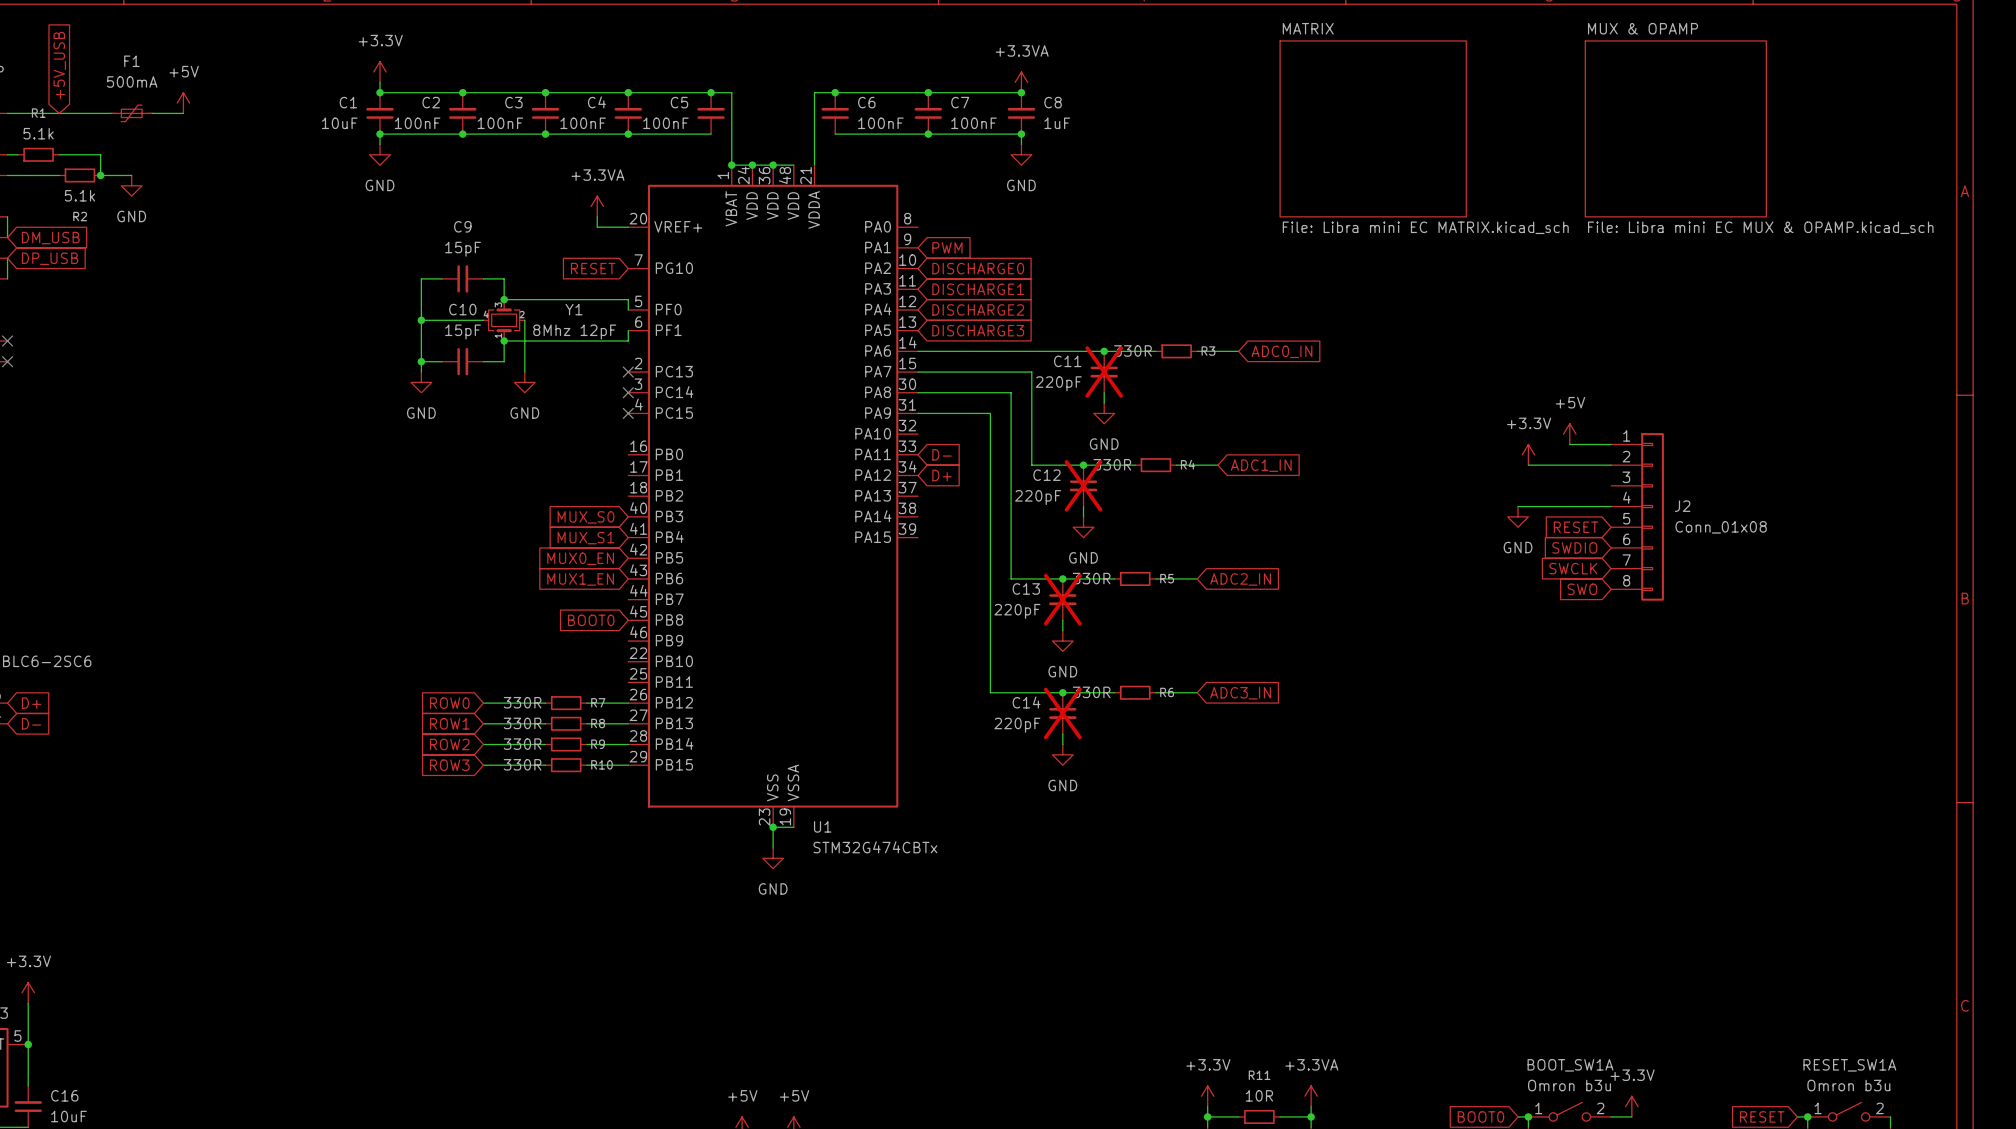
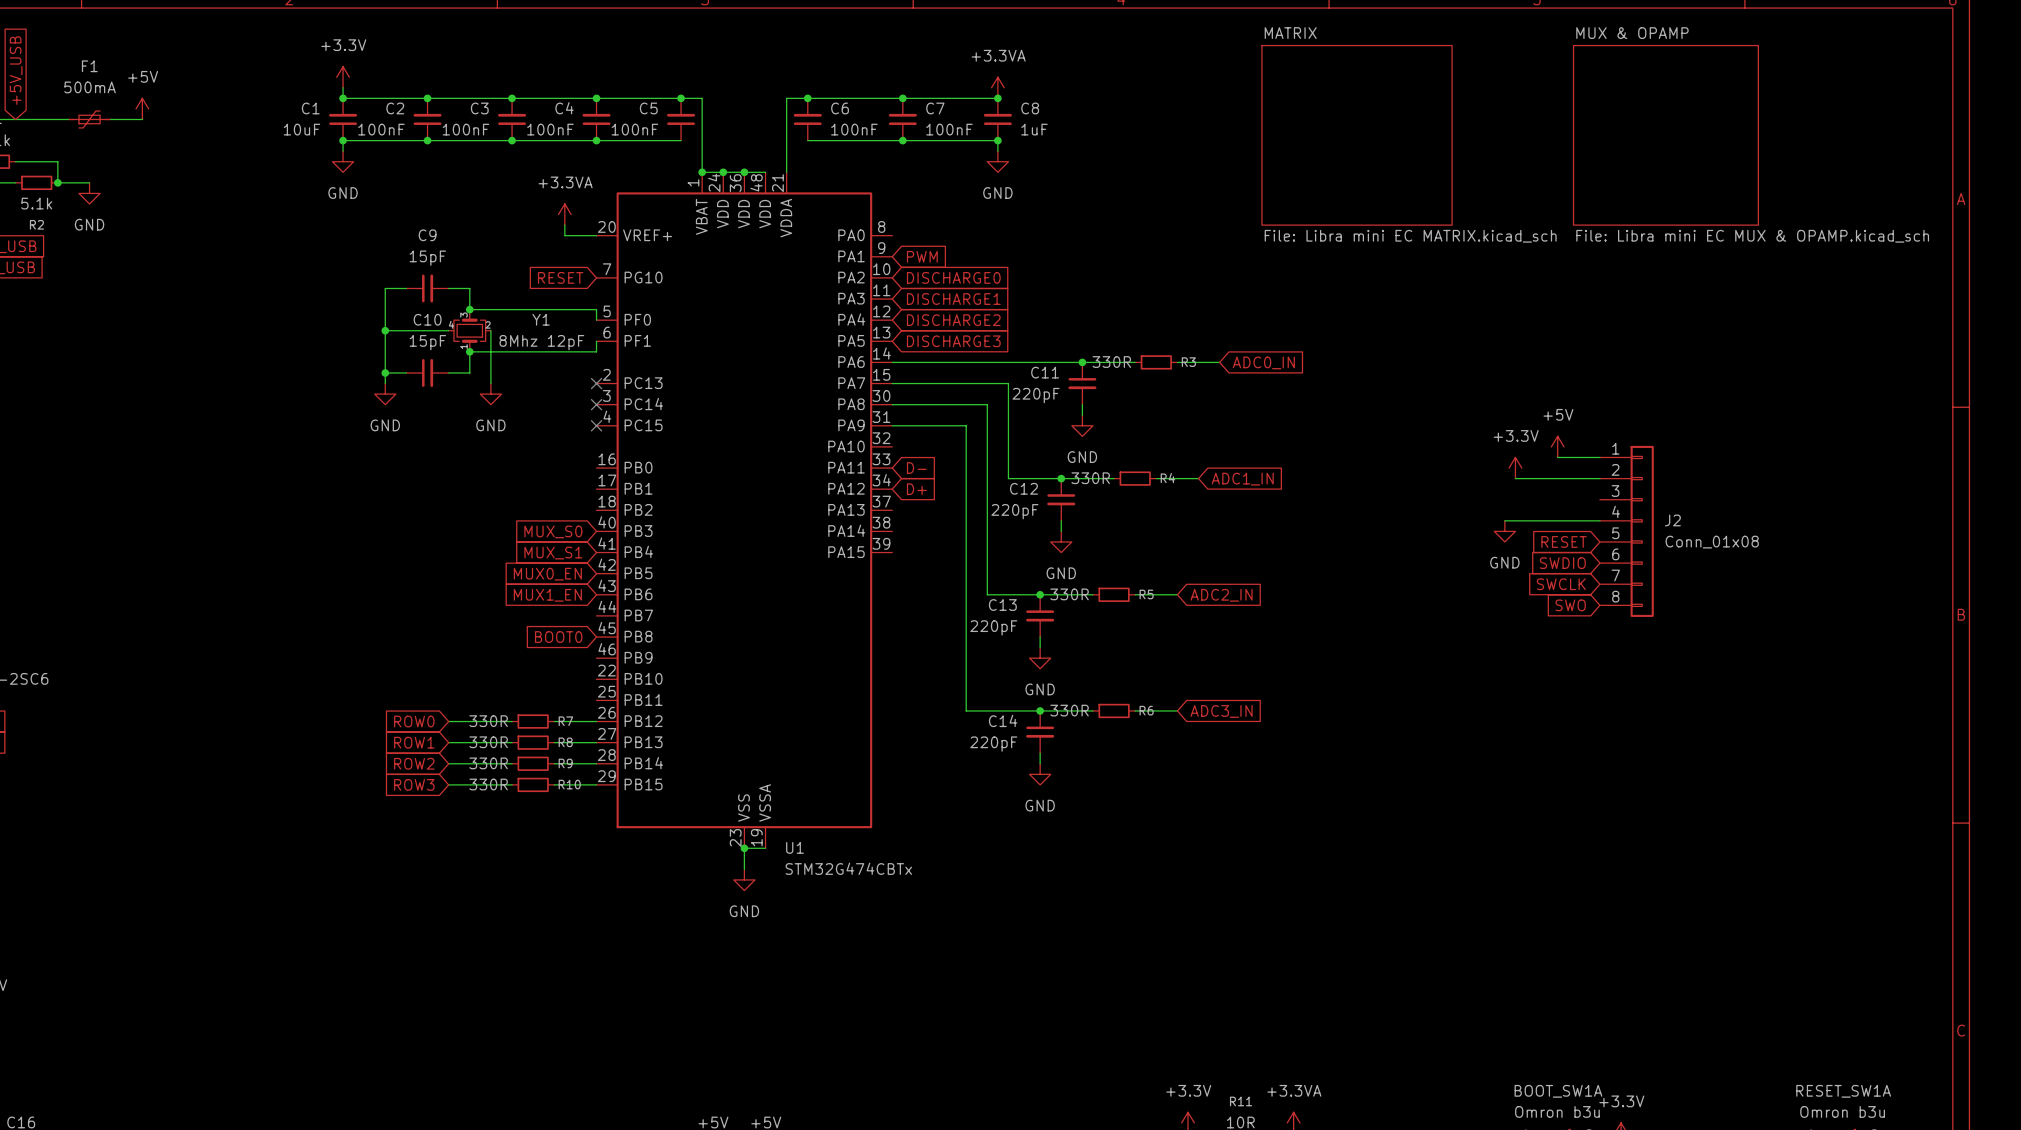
C11 do-not-place cross: (1104, 372) -> none
C12 do-not-place cross: (1083, 485) -> none
C13 do-not-place cross: (1062, 599) -> none
C14 do-not-place cross: (1062, 713) -> none

